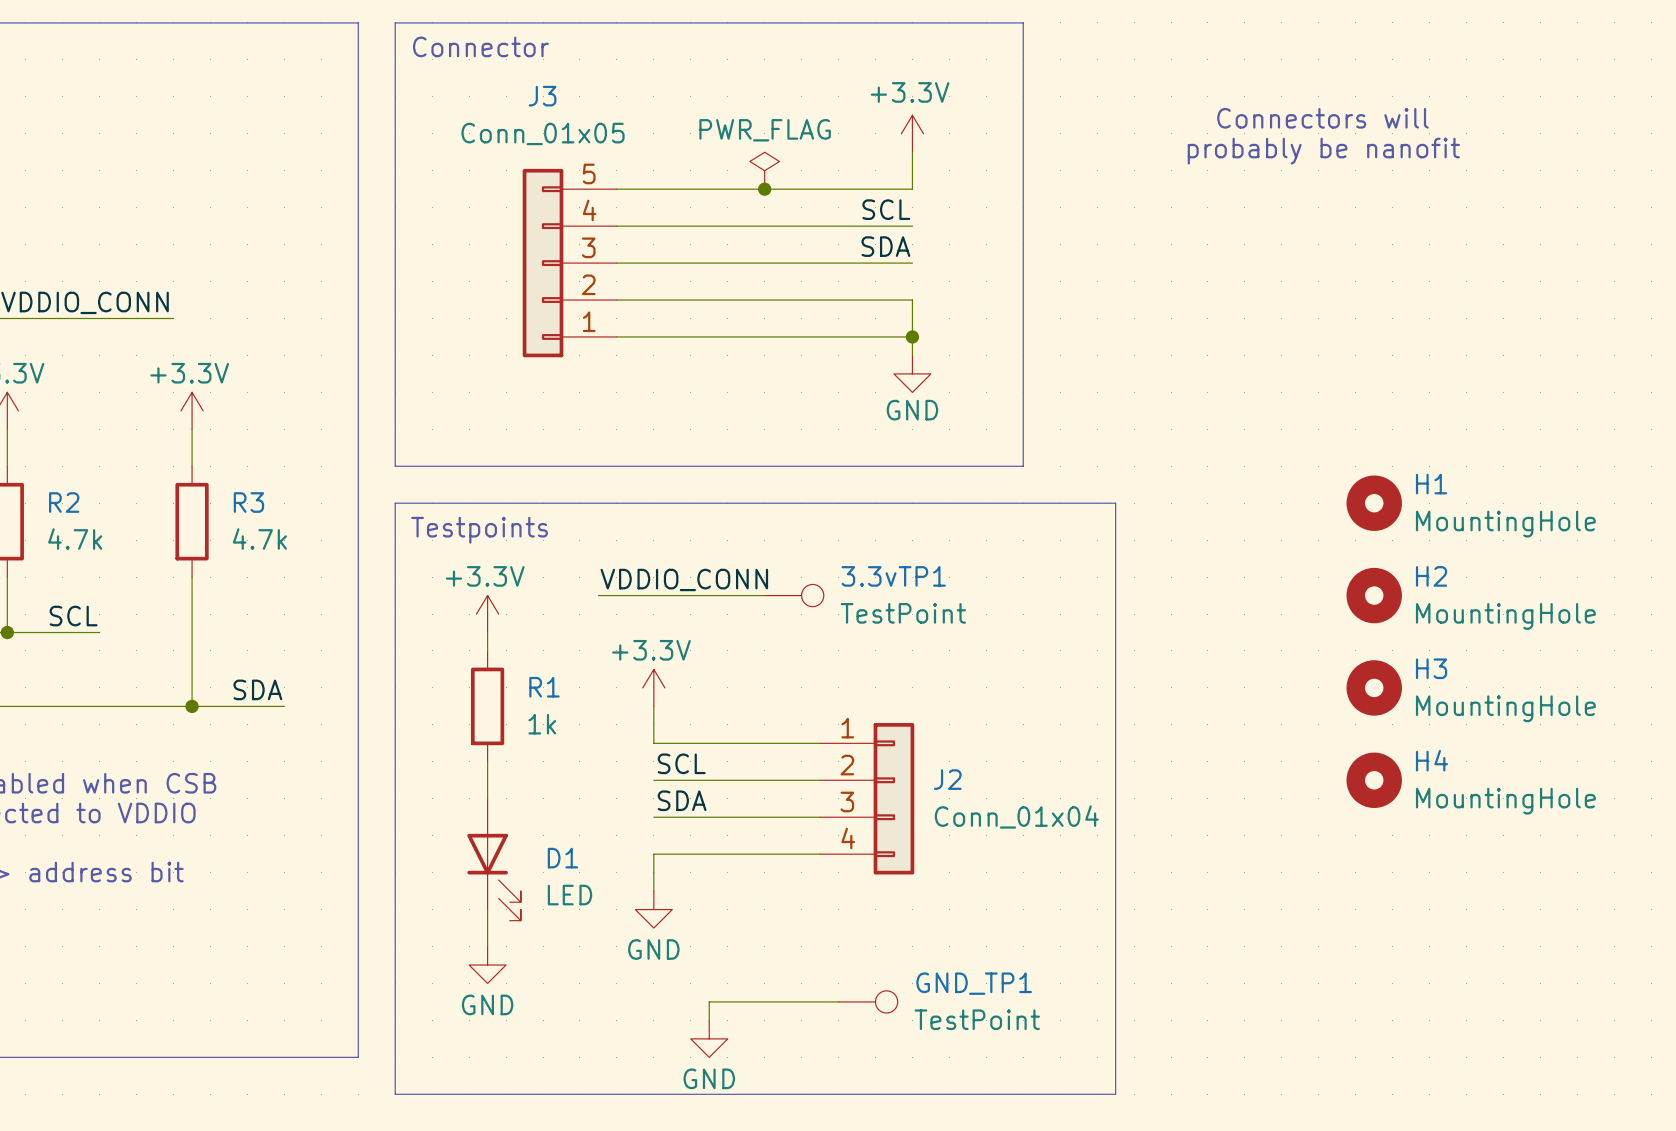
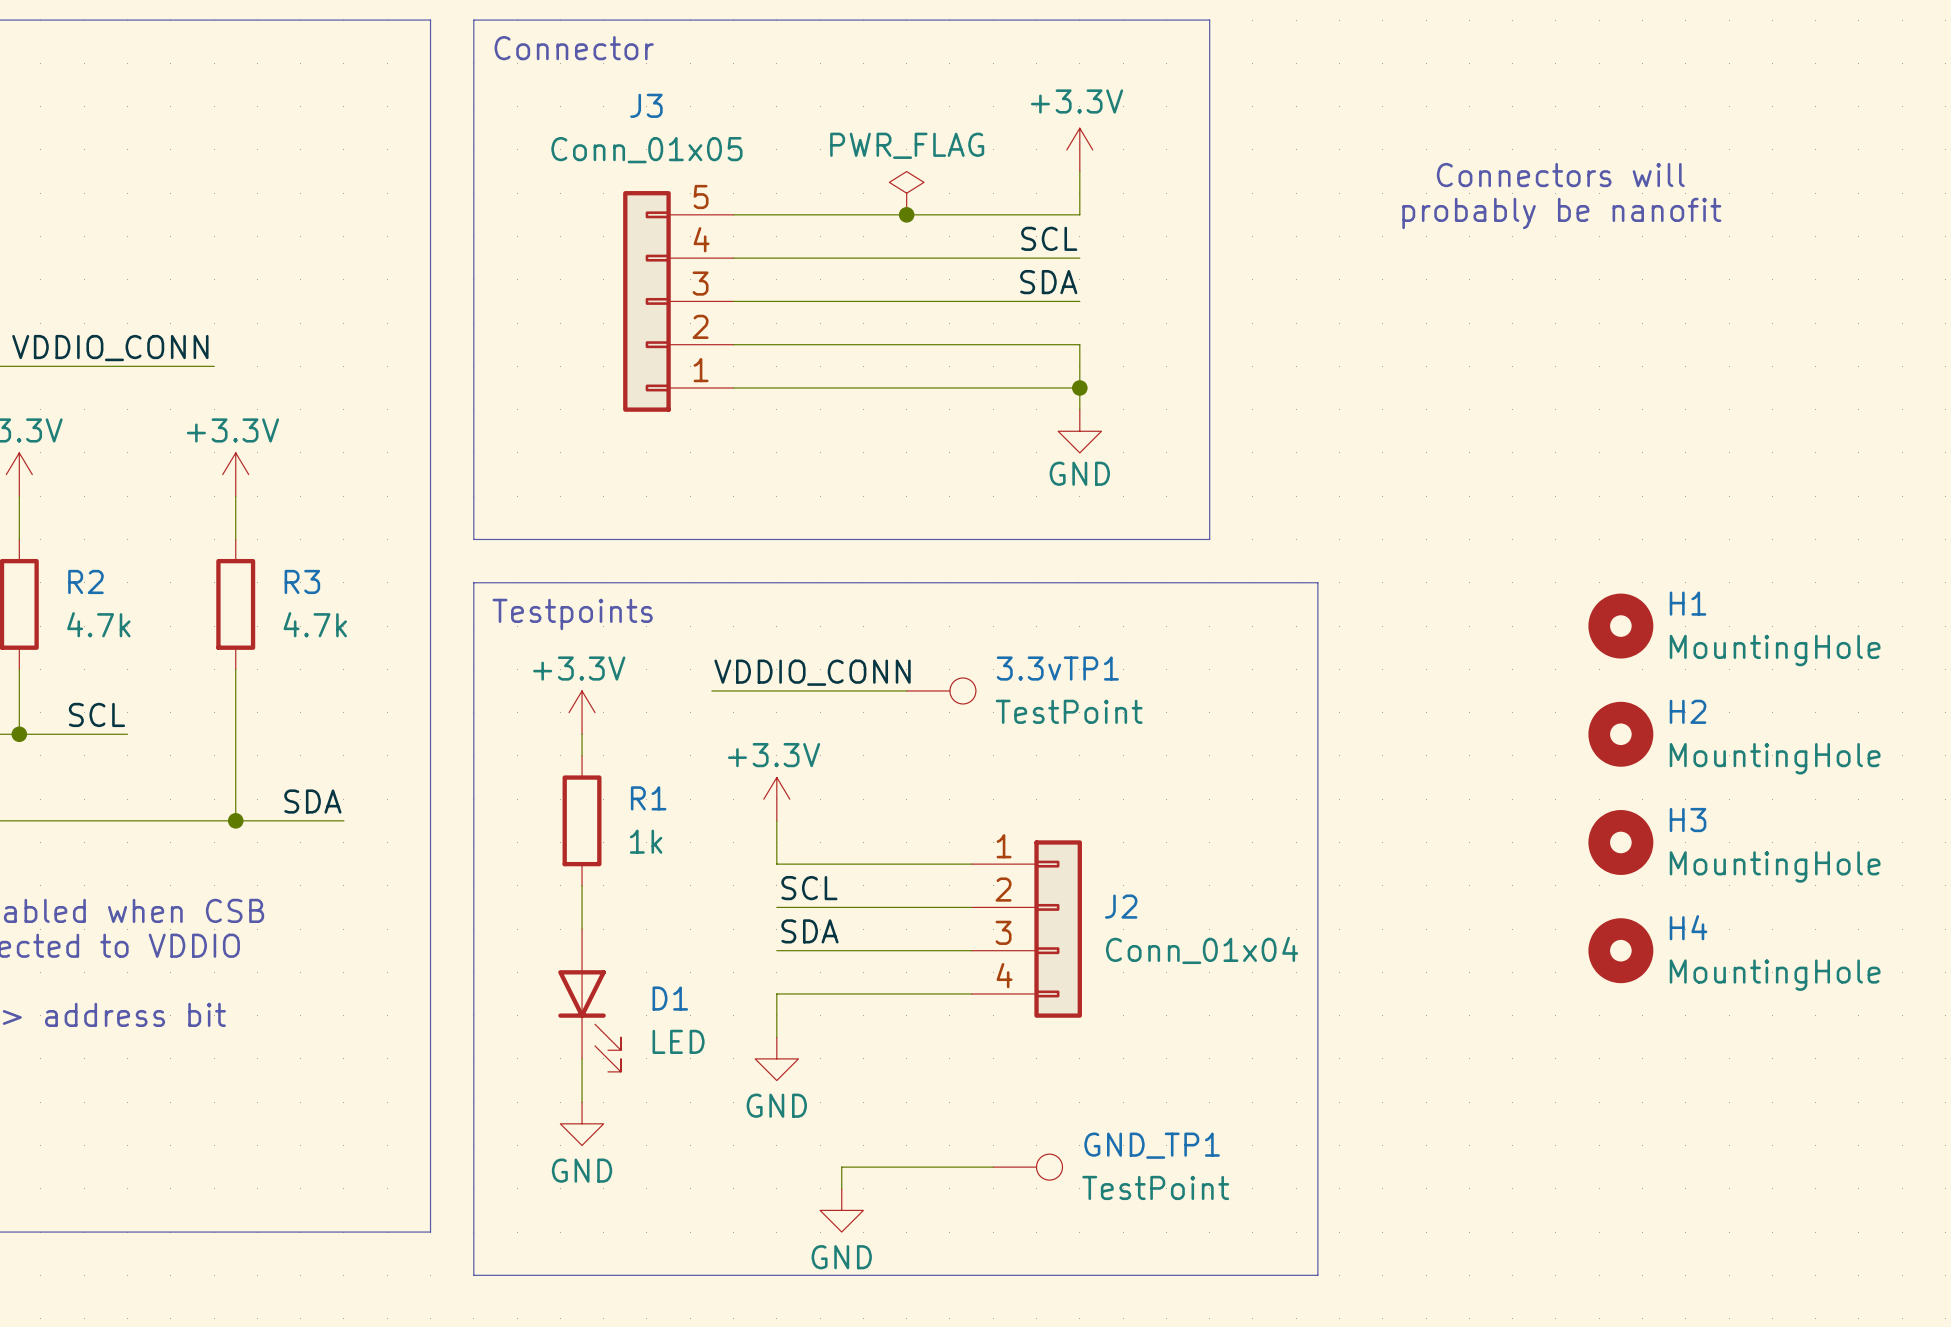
text: Connectors will (1322, 118) -> none
text: probably be nanofit (1323, 151) -> Connectors will (1560, 175)
text: none -> probably be nanofit (1561, 213)
H1 position: (1374, 503) -> (1620, 626)
H2 position: (1374, 595) -> (1620, 734)
H3 position: (1374, 687) -> (1620, 842)
H4 position: (1374, 780) -> (1620, 950)

